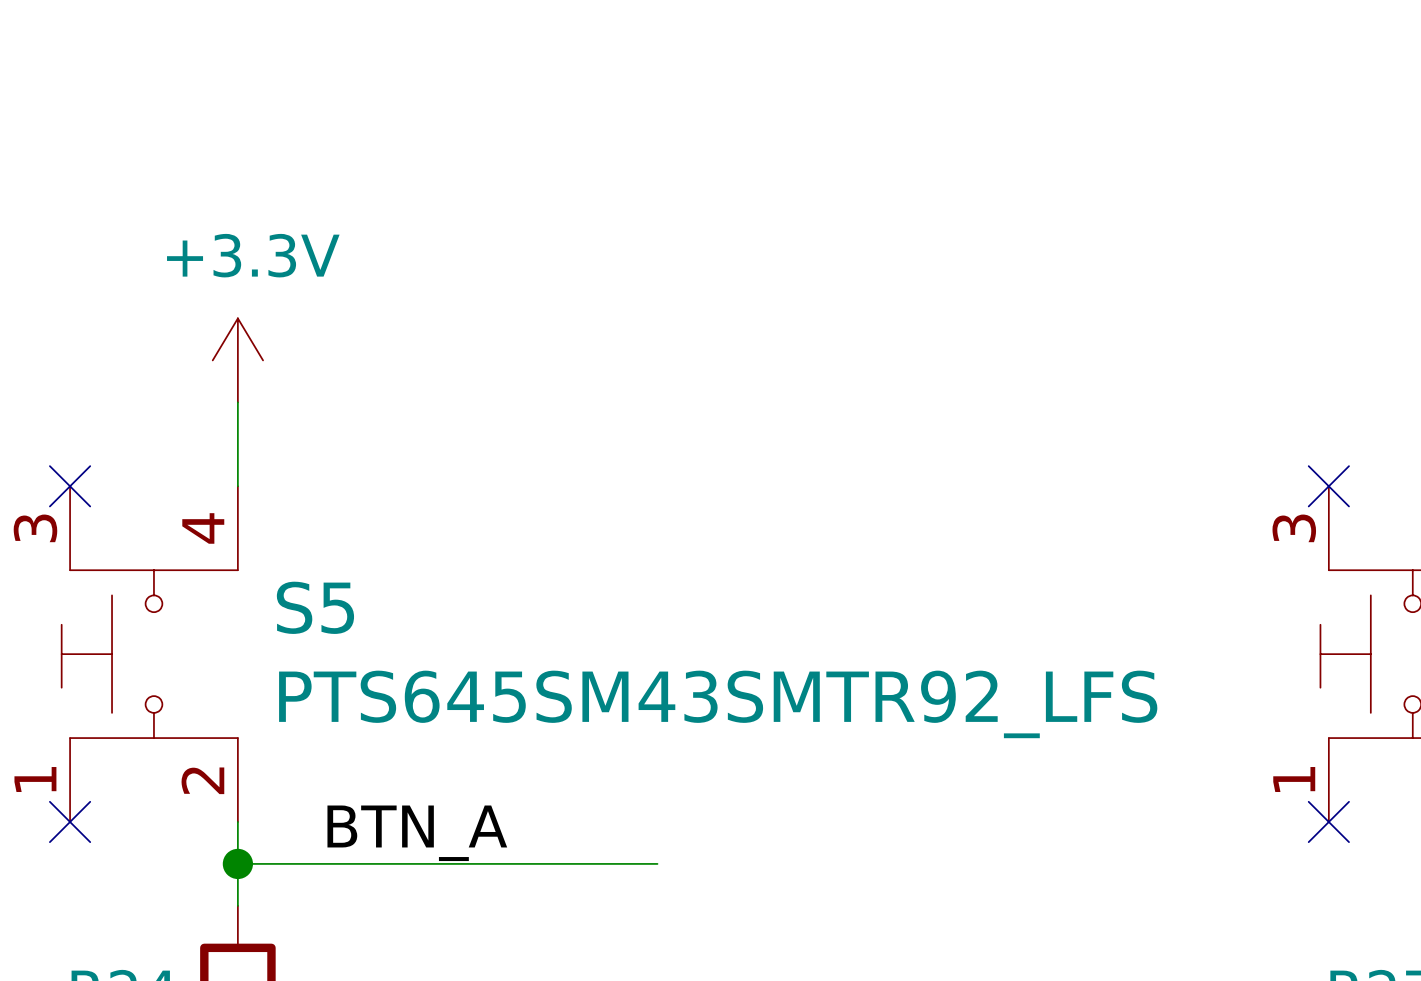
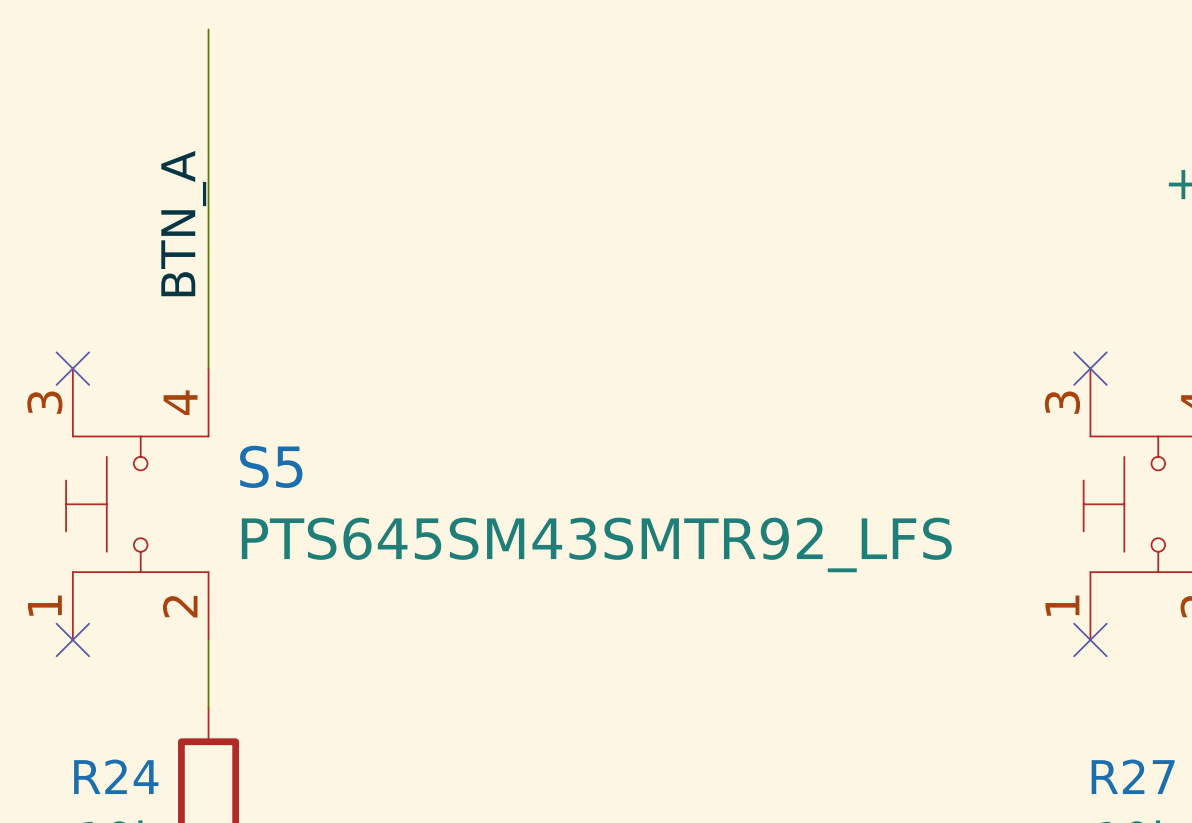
wire: none -> (208, 29) (208, 300)
power symbol: +3.3V (237, 360) -> none
label rotation: 0° (417, 833) -> 90° counterclockwise (183, 223)
label position: BTN_A (417, 833) -> BTN_A (183, 223)
wire: (237, 863) (657, 863) -> none
junction: (237, 863) -> none

